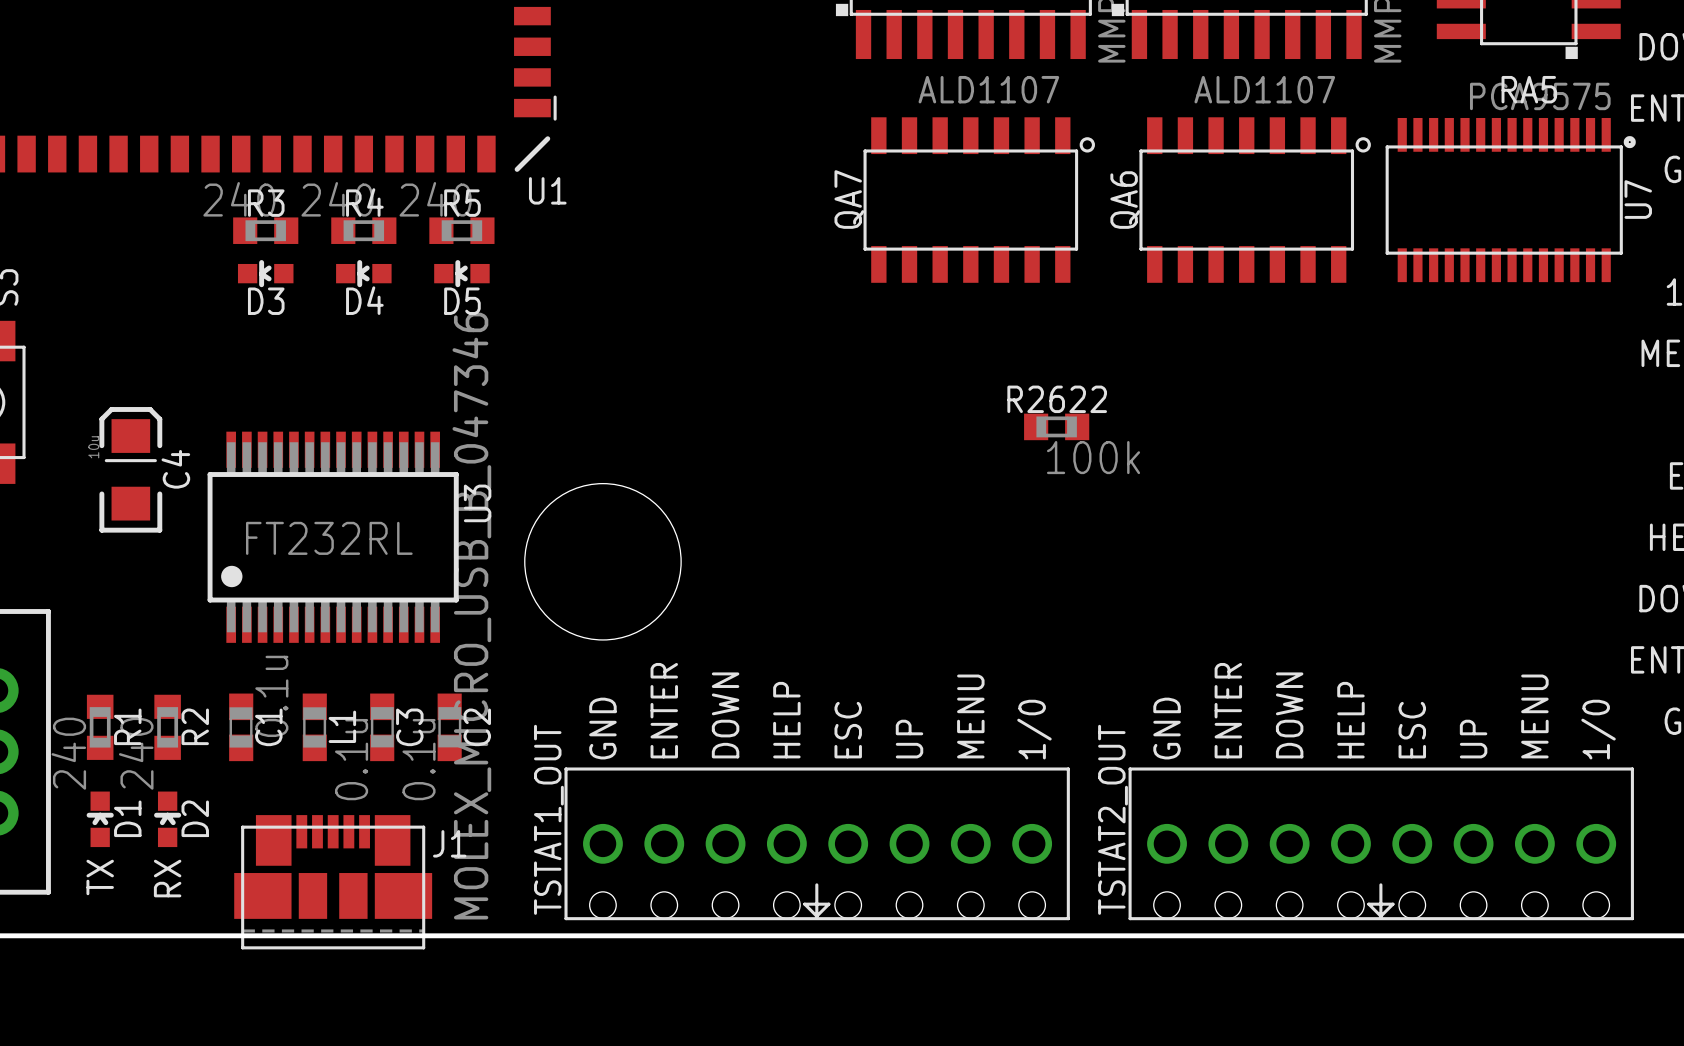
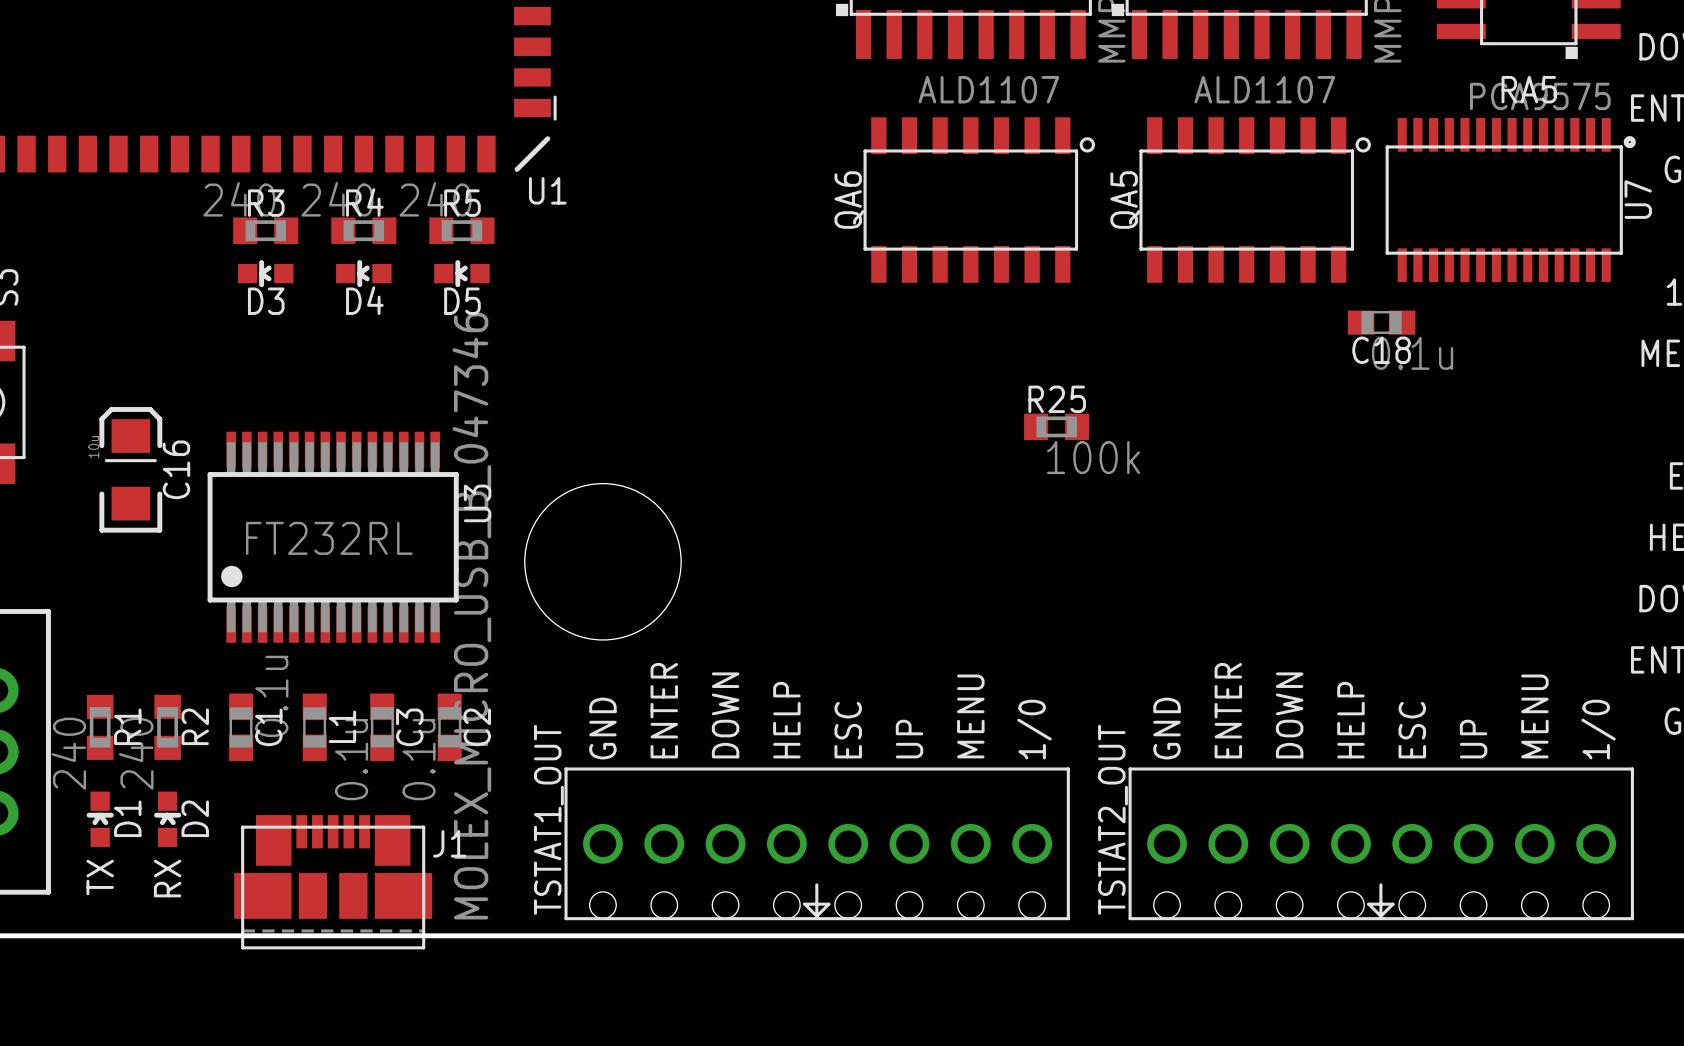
QA7 name: QA7 (849, 199) -> QA6 (849, 200)
QA6 name: QA6 (1125, 200) -> QA5 (1125, 200)
C18: none -> 0.1u (1381, 322)
R2622 name: R2622 (1057, 399) -> R25 (1057, 399)
C4 name: C4 (175, 469) -> C16 (176, 469)

